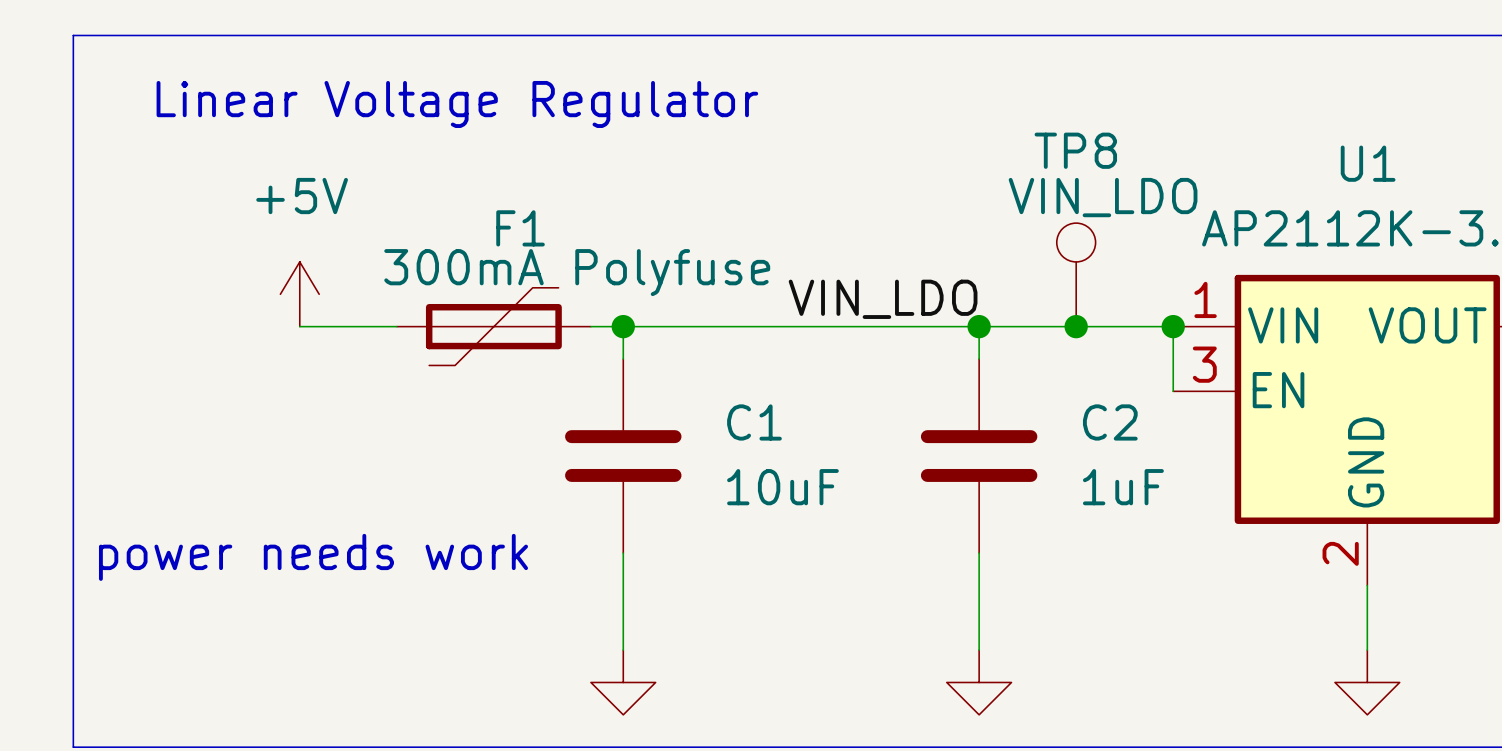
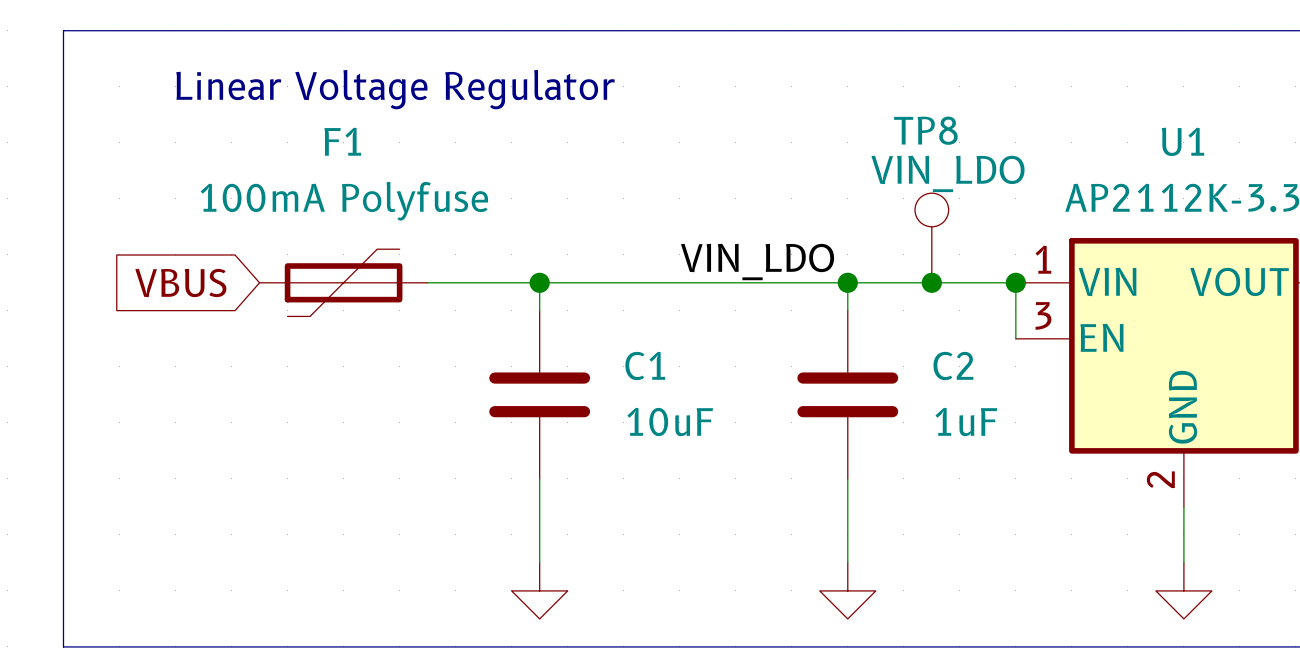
F1 name position: F1 (520, 228) -> F1 (342, 141)
F1 value: 300mA Polyfuse (577, 272) -> 100mA Polyfuse (344, 201)
power symbol: +5V (299, 294) -> none
global label: none -> VBUS (180, 283)
F1 position: (493, 326) -> (343, 282)
text: power needs work (313, 557) -> none

